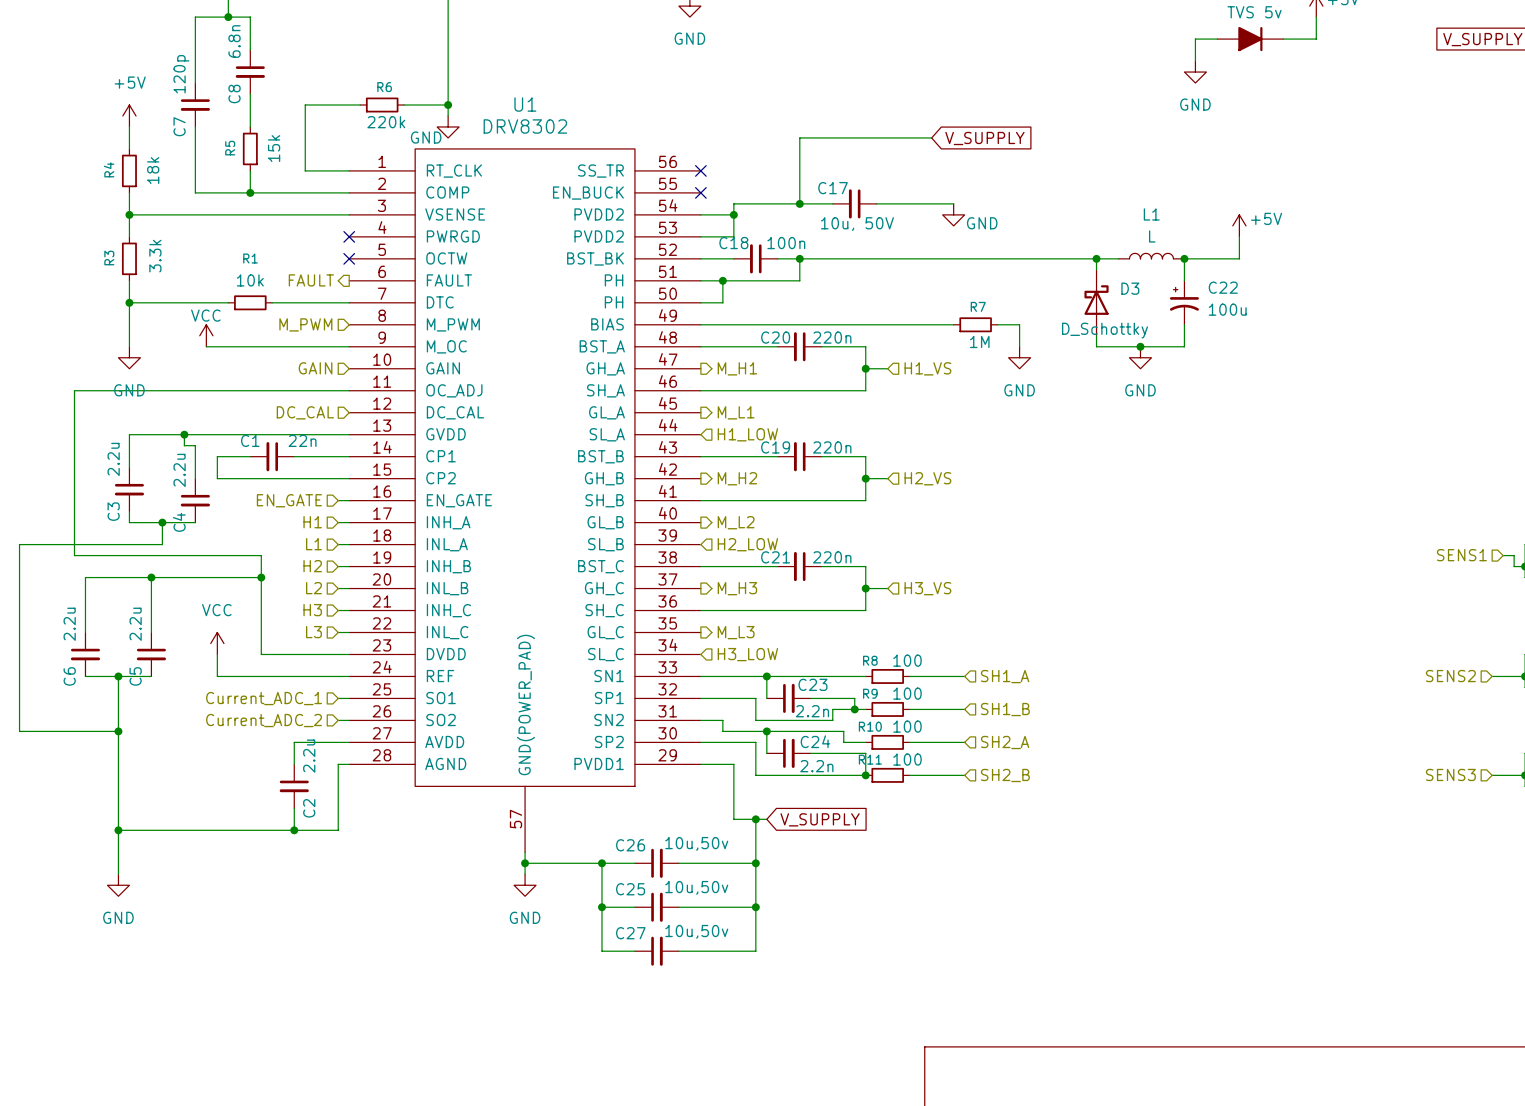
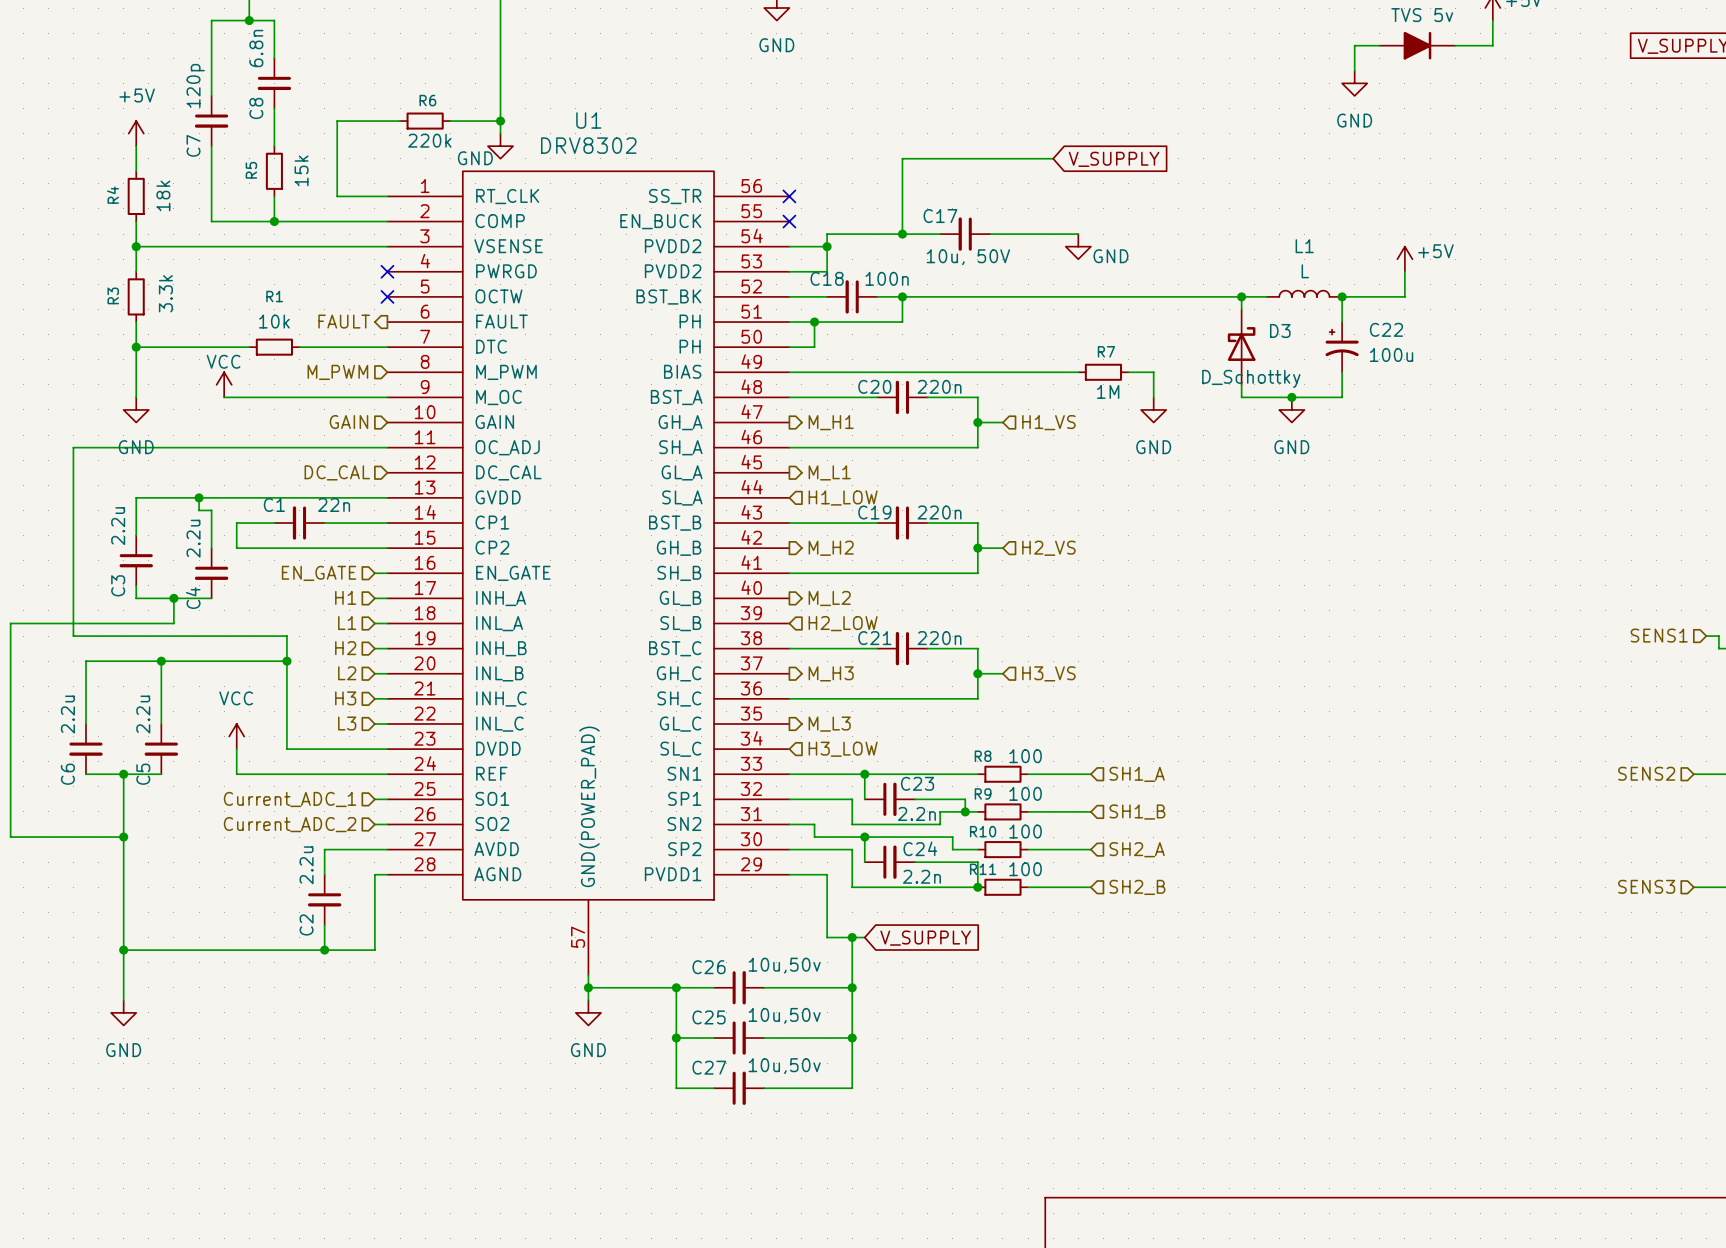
C2 value position: 2.2u (309, 756) -> 2.2u (306, 865)
C2 name position: C2 (309, 808) -> C2 (306, 924)

